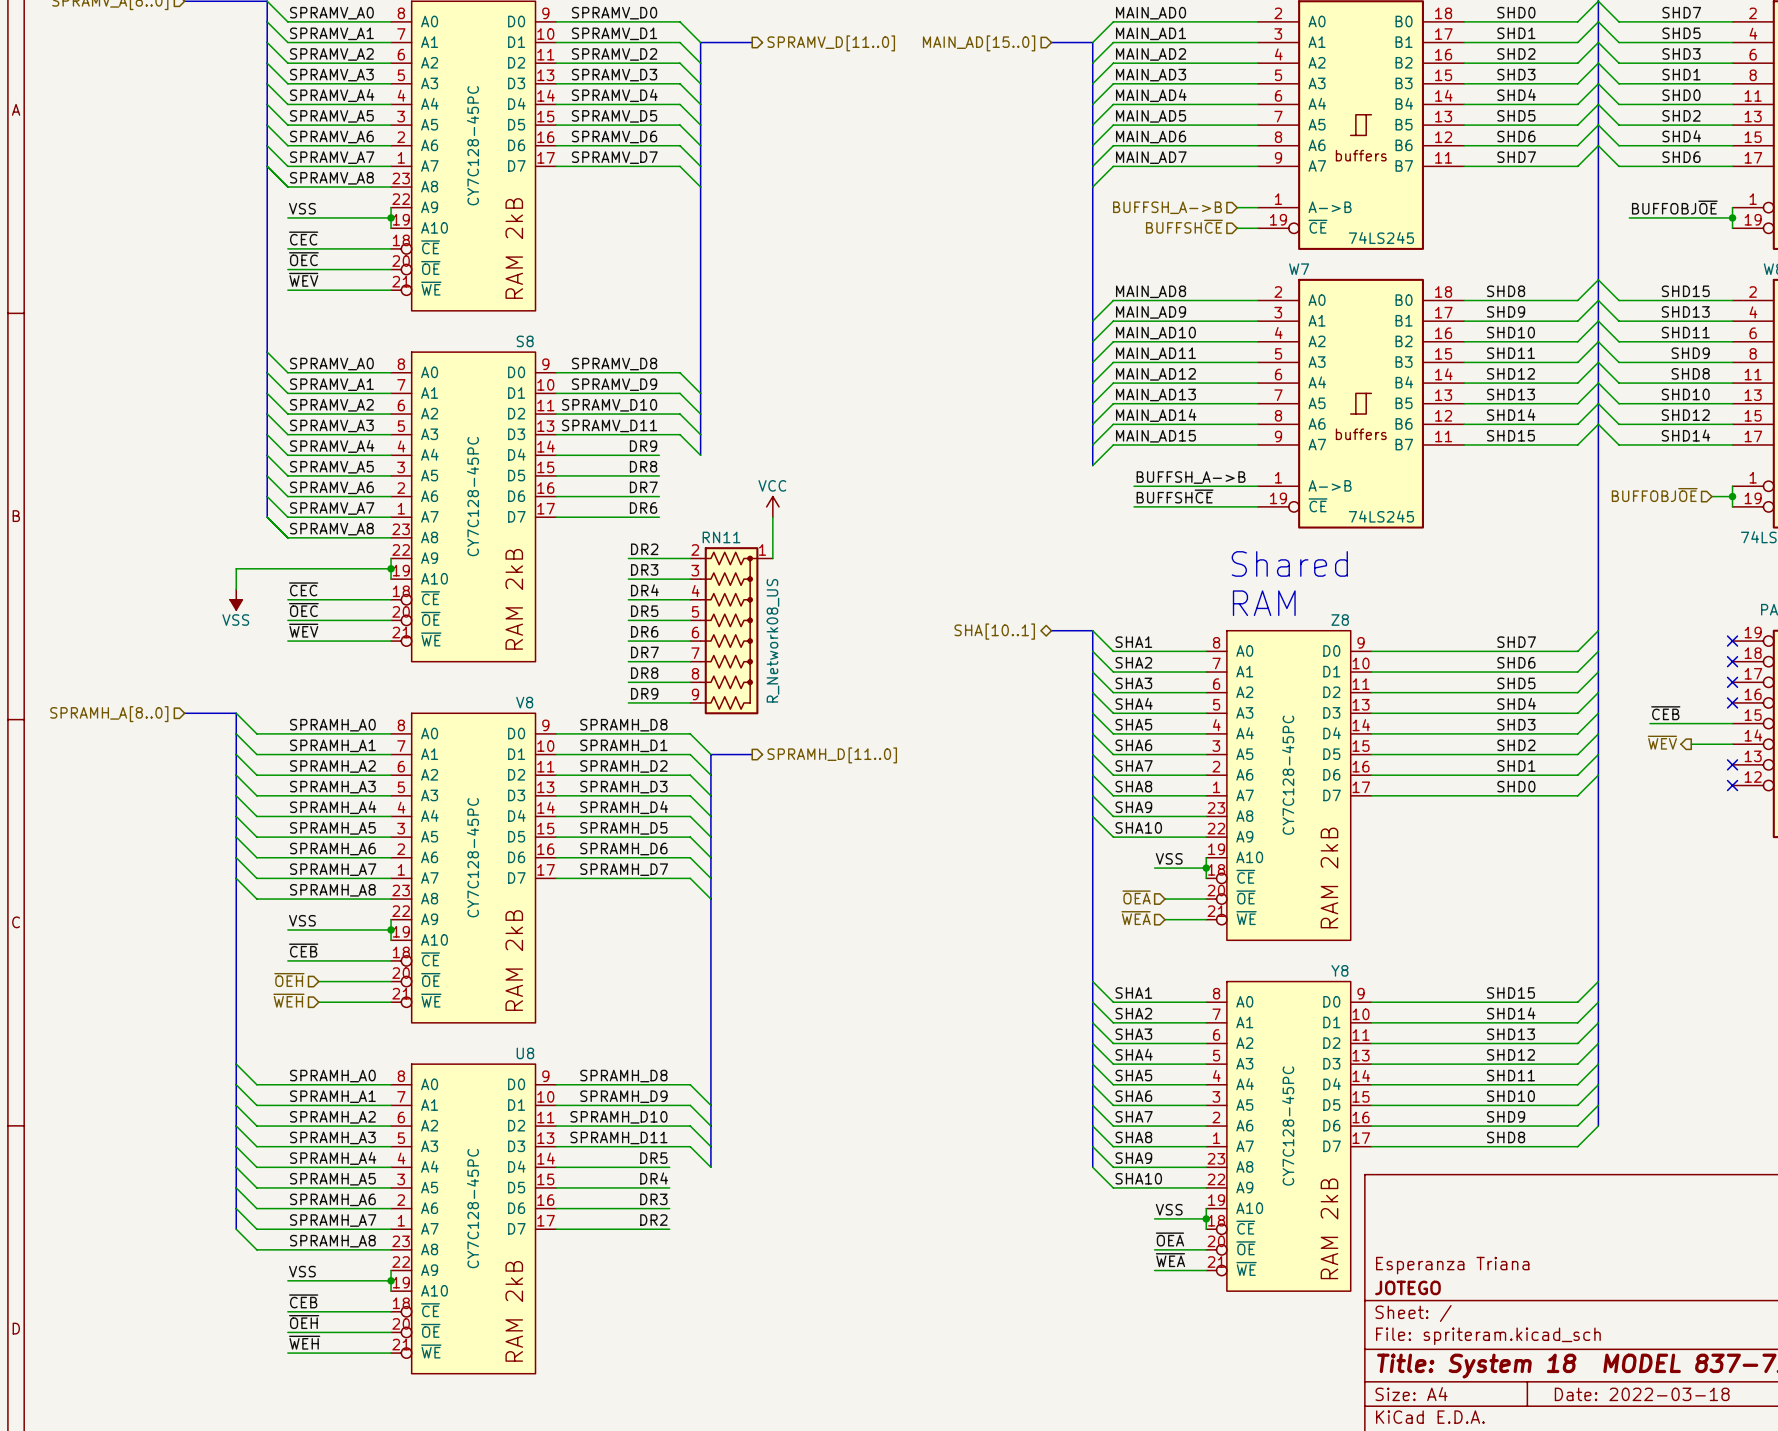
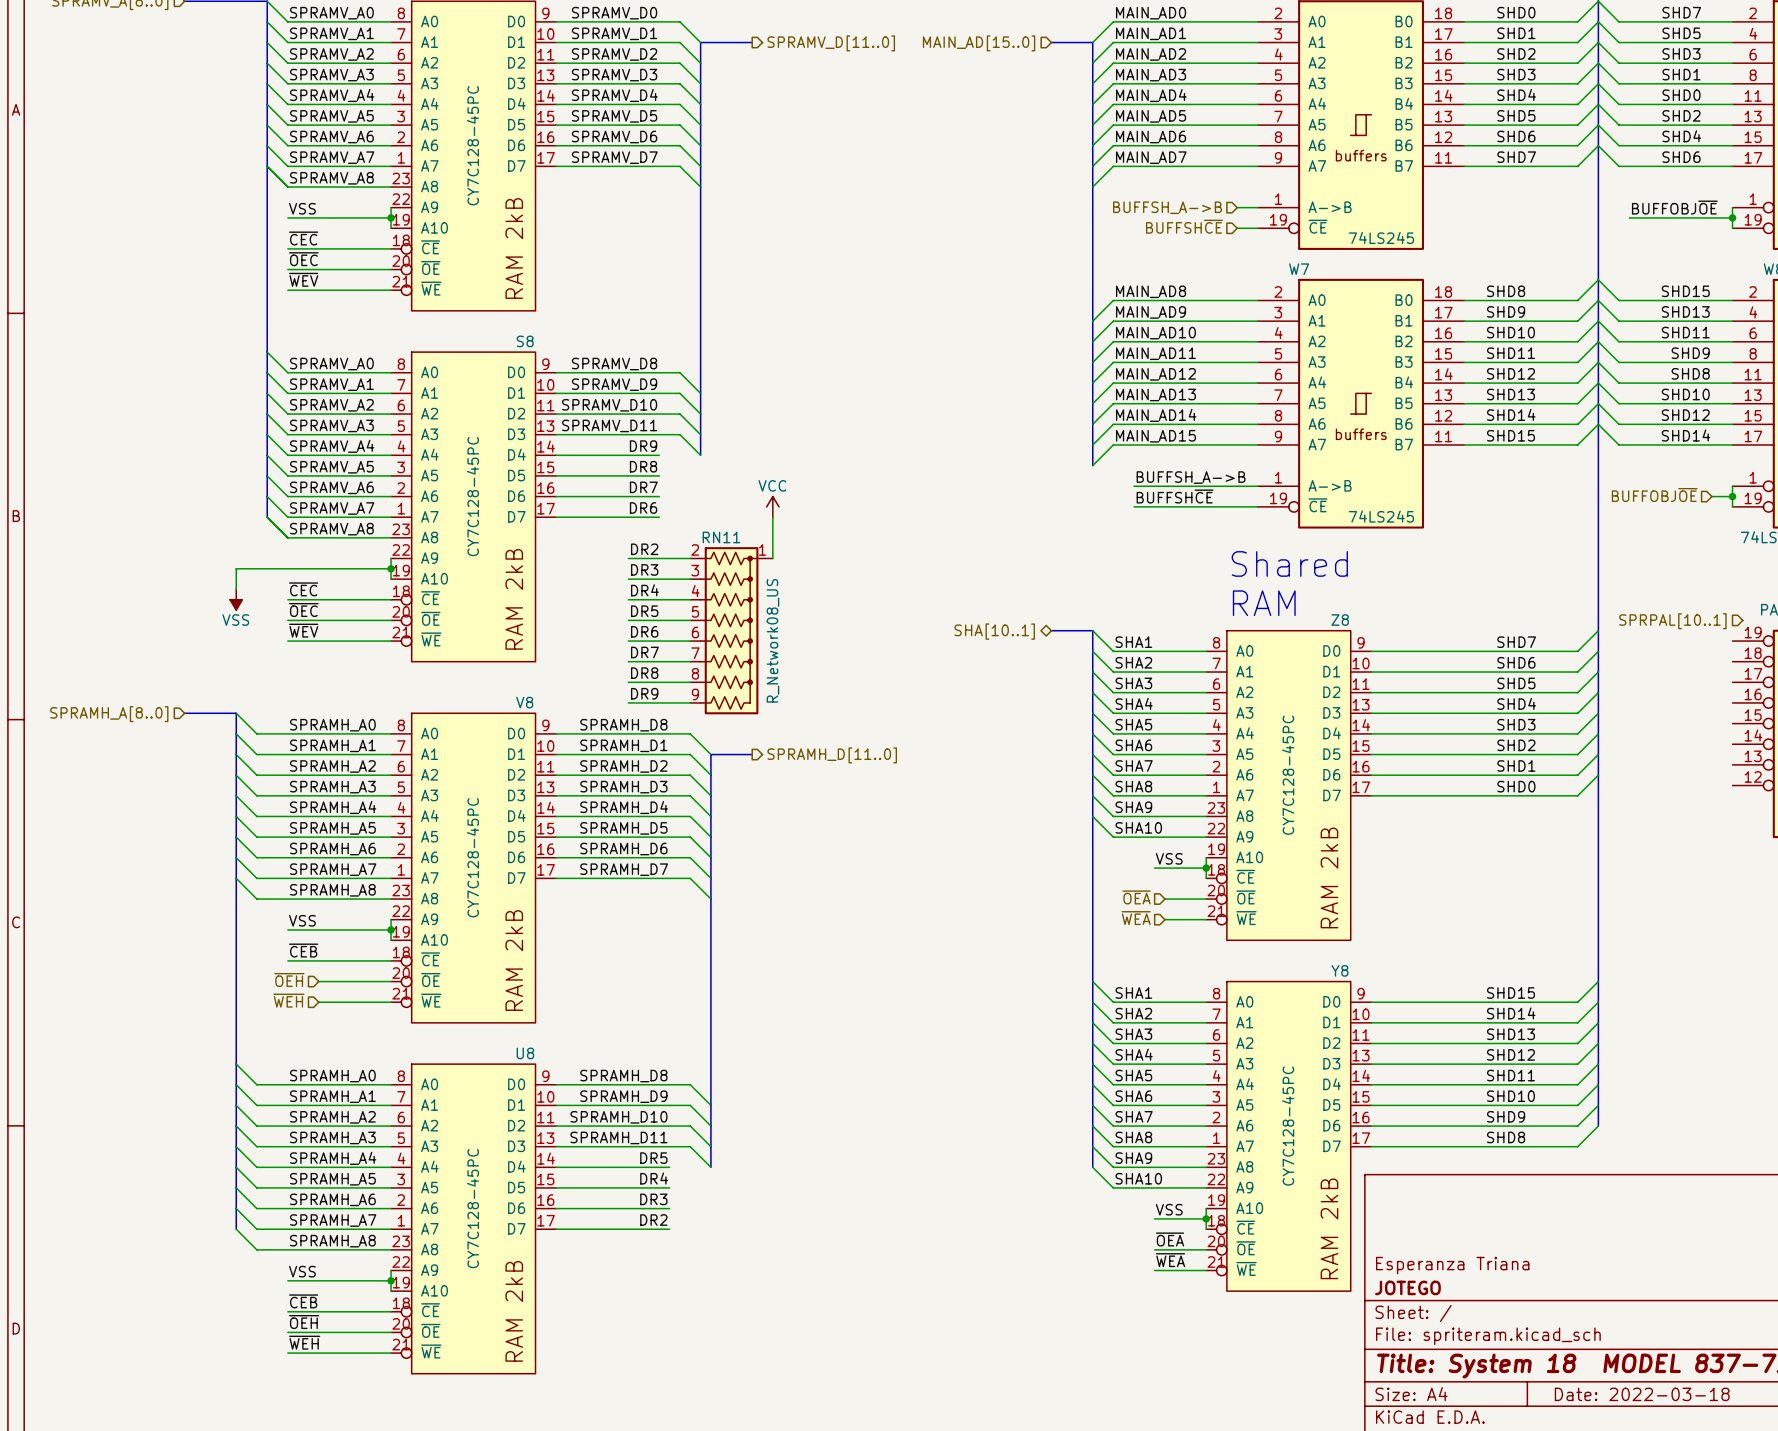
hierarchical label: none -> SPRPAL[10..1] (1672, 621)
no-connect mark: (1732, 641) -> none
no-connect mark: (1732, 661) -> none
no-connect mark: (1732, 682) -> none
no-connect mark: (1732, 702) -> none
label: ~{CEB} (1665, 713) -> none
wire: (1649, 723) (1732, 723) -> none
hierarchical label: ~{WEV} (1662, 742) -> none
wire: (1691, 744) (1732, 744) -> none
no-connect mark: (1732, 764) -> none
no-connect mark: (1732, 785) -> none

